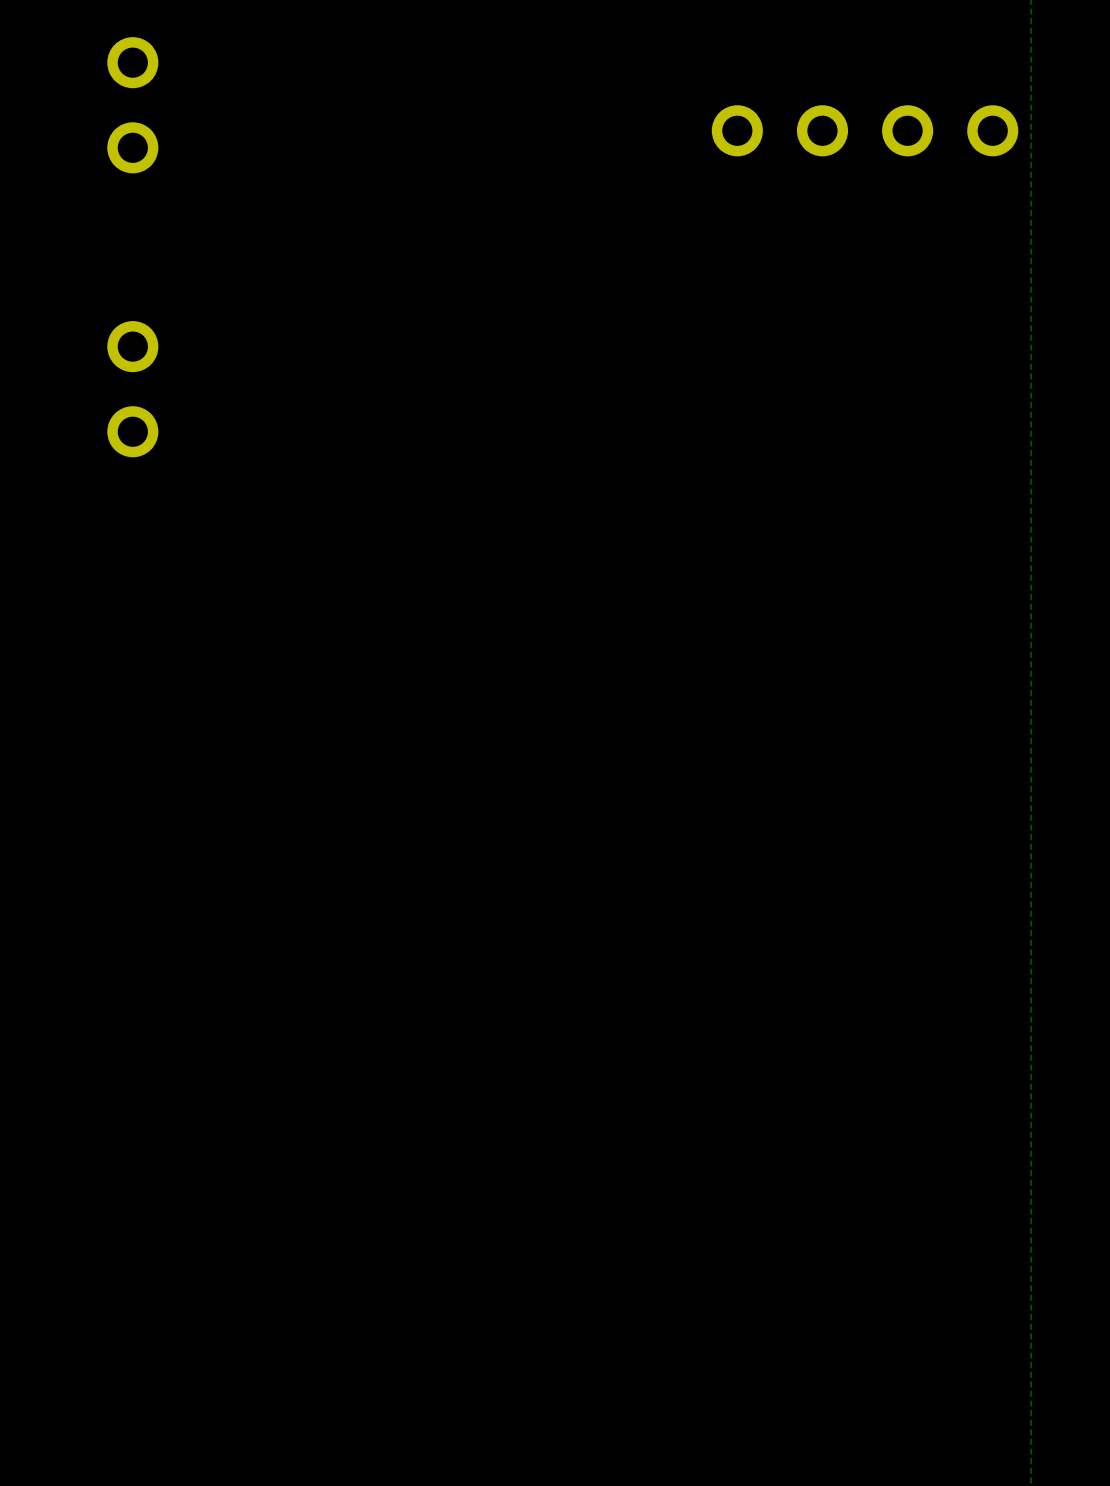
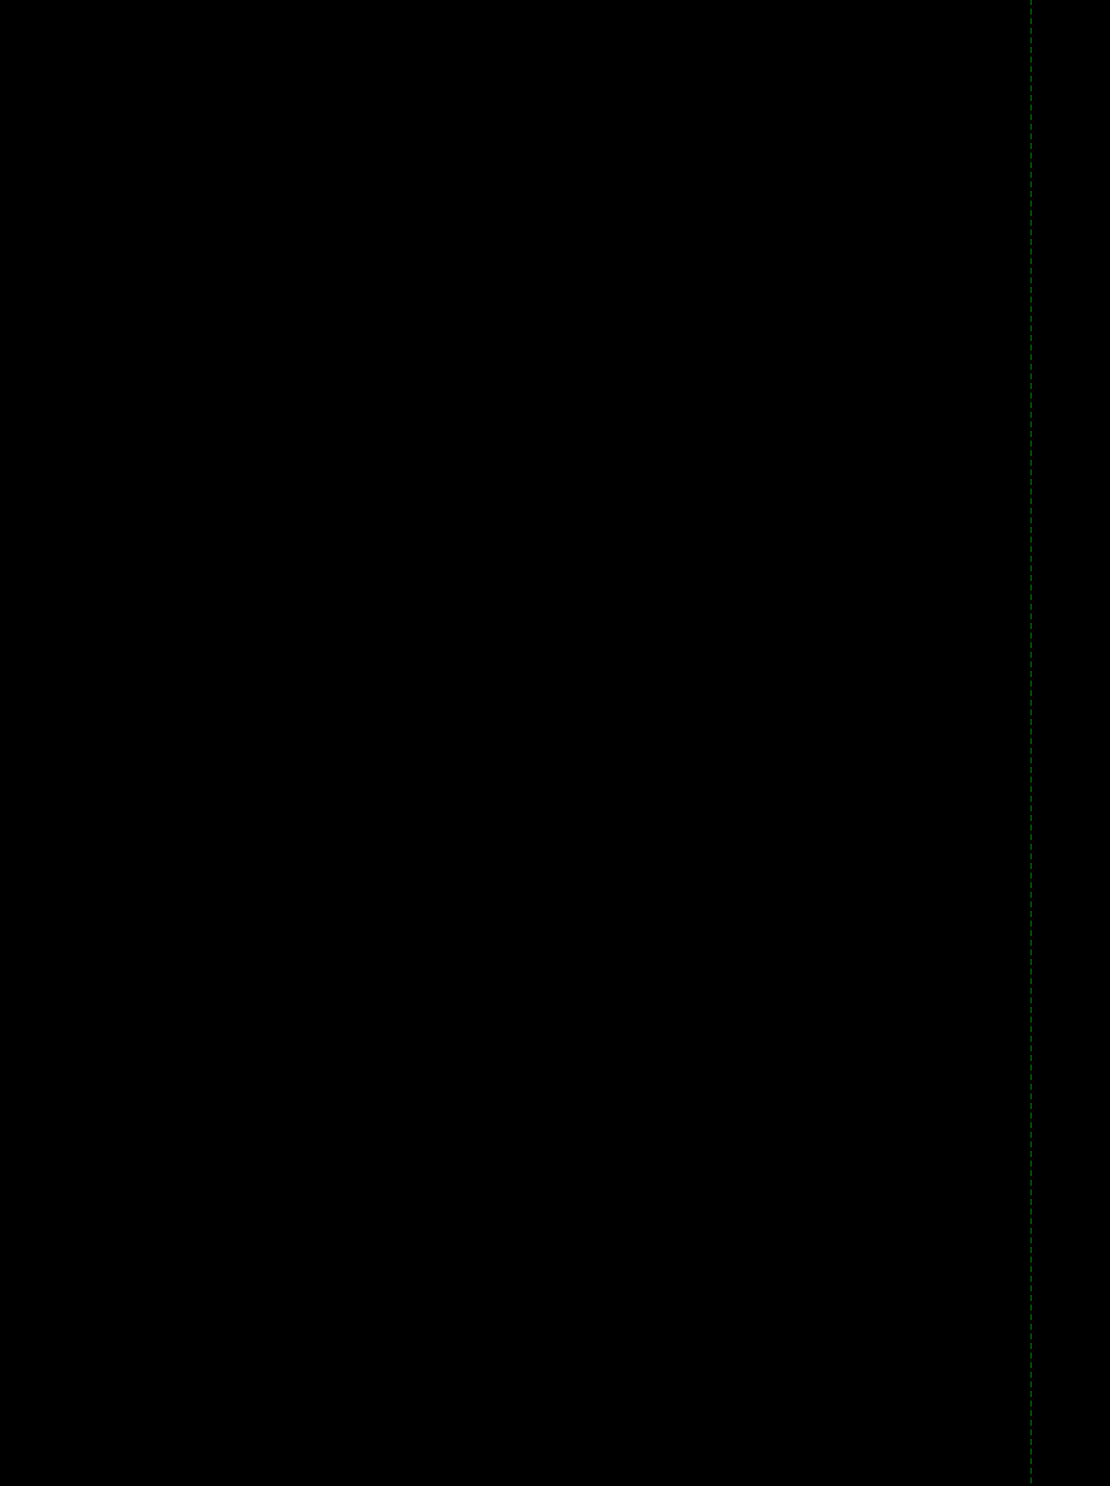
part: (132, 105) -> none
part: (865, 130) -> none
part: (132, 389) -> none

